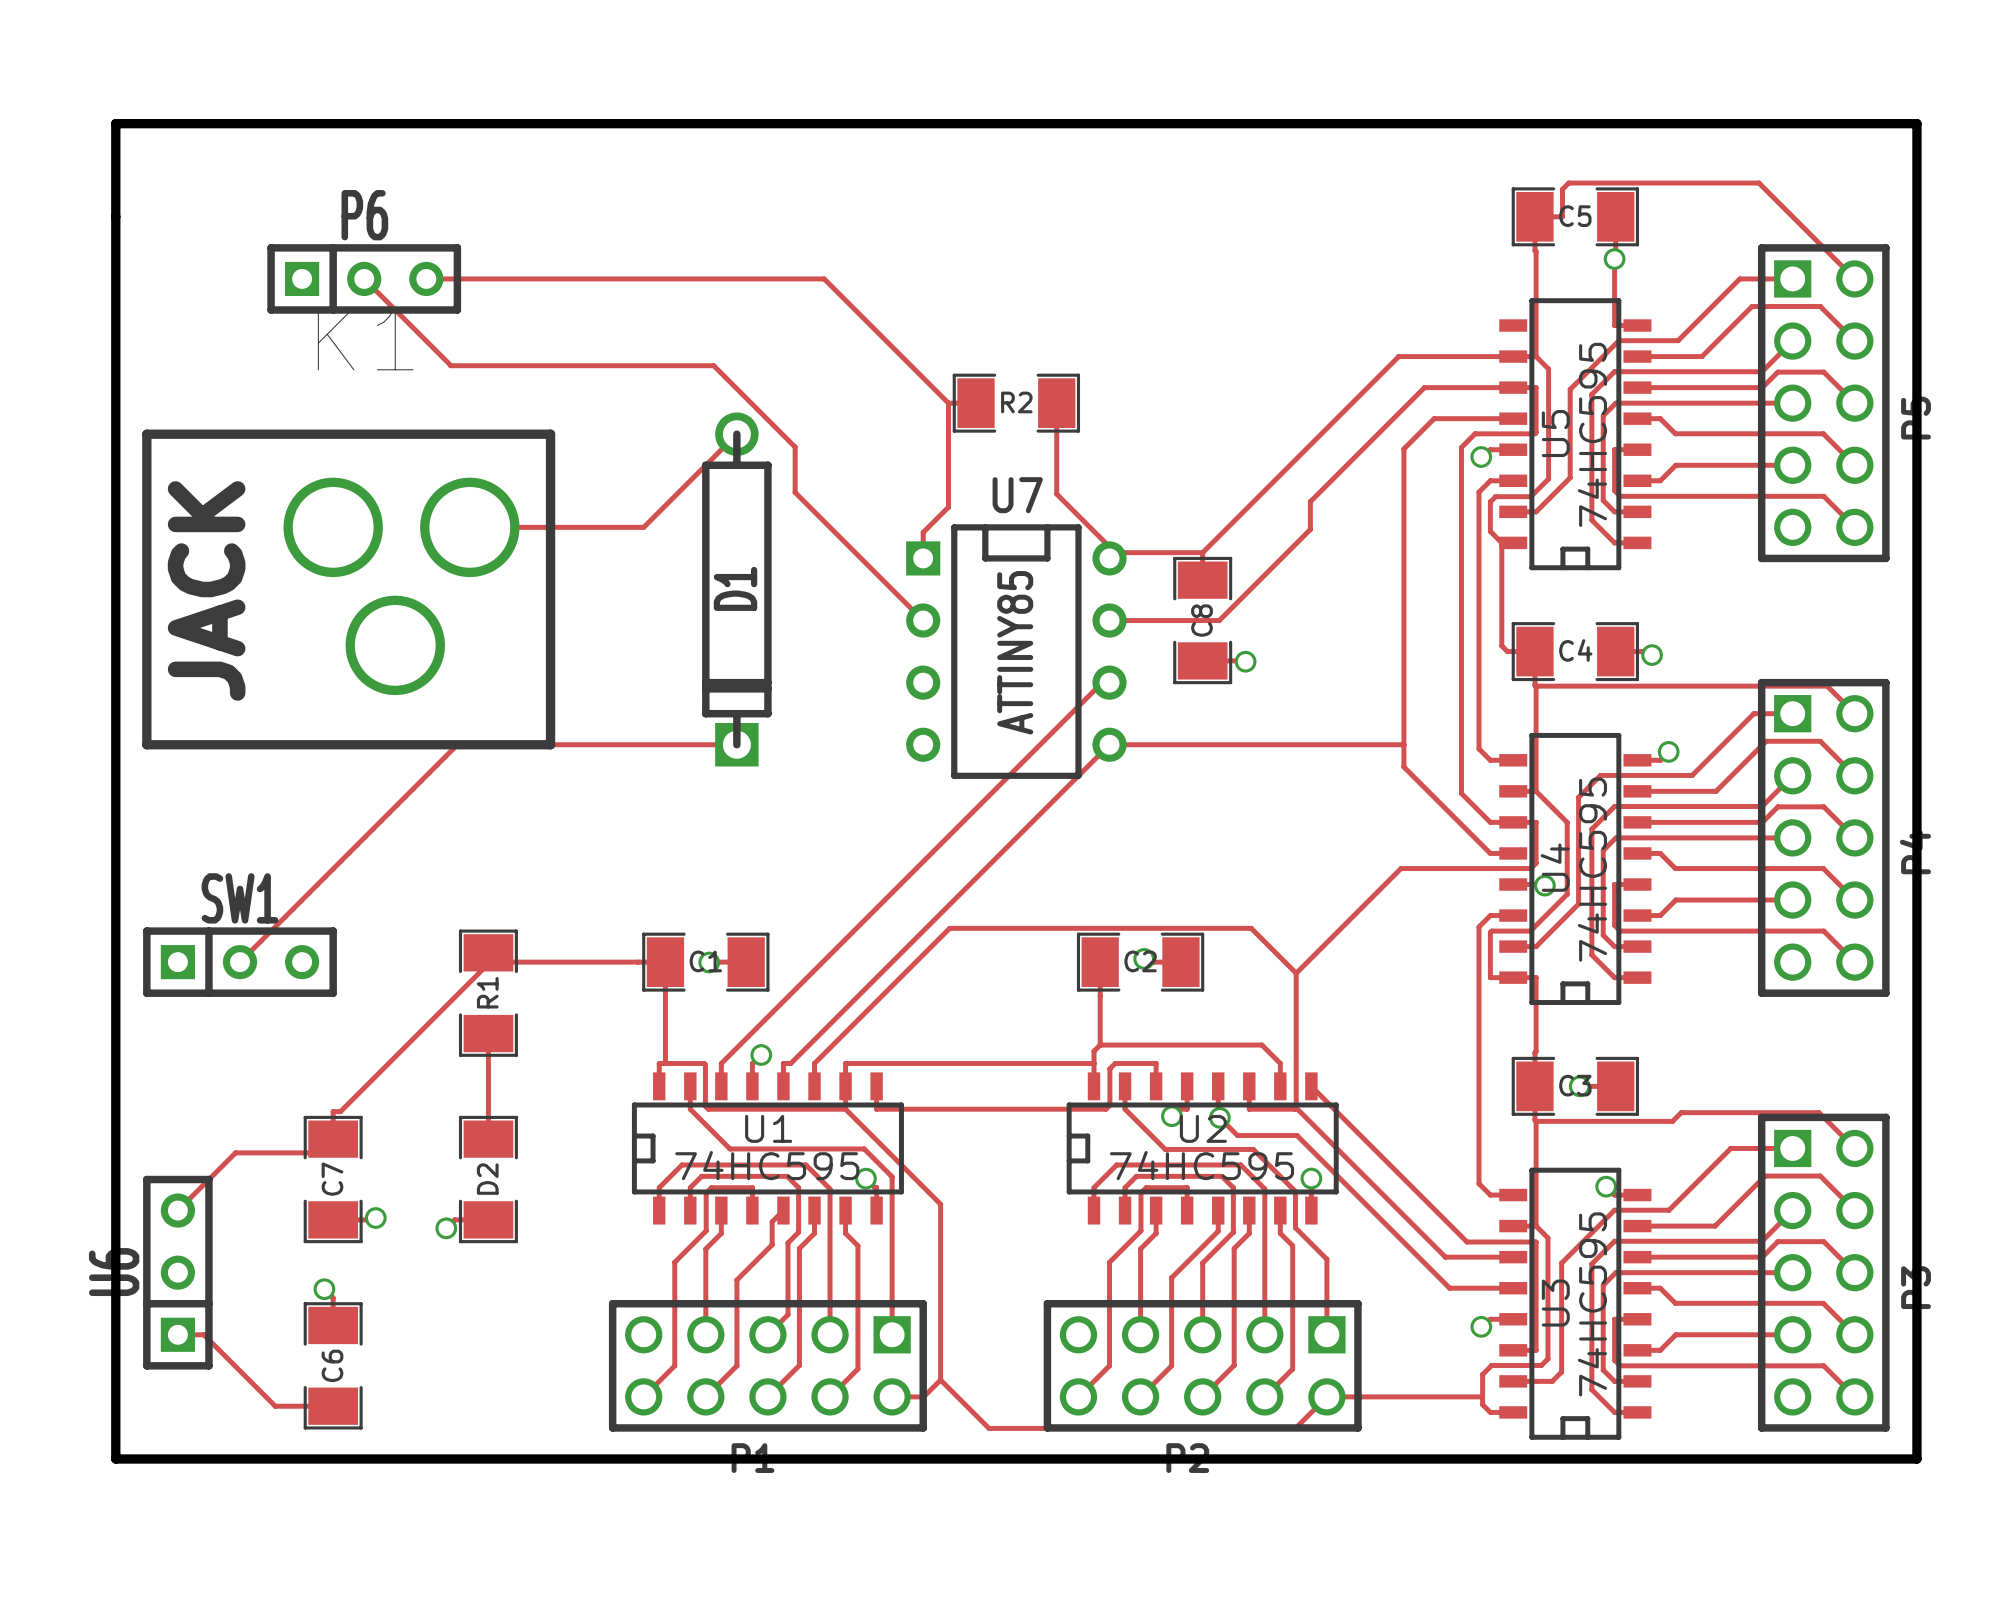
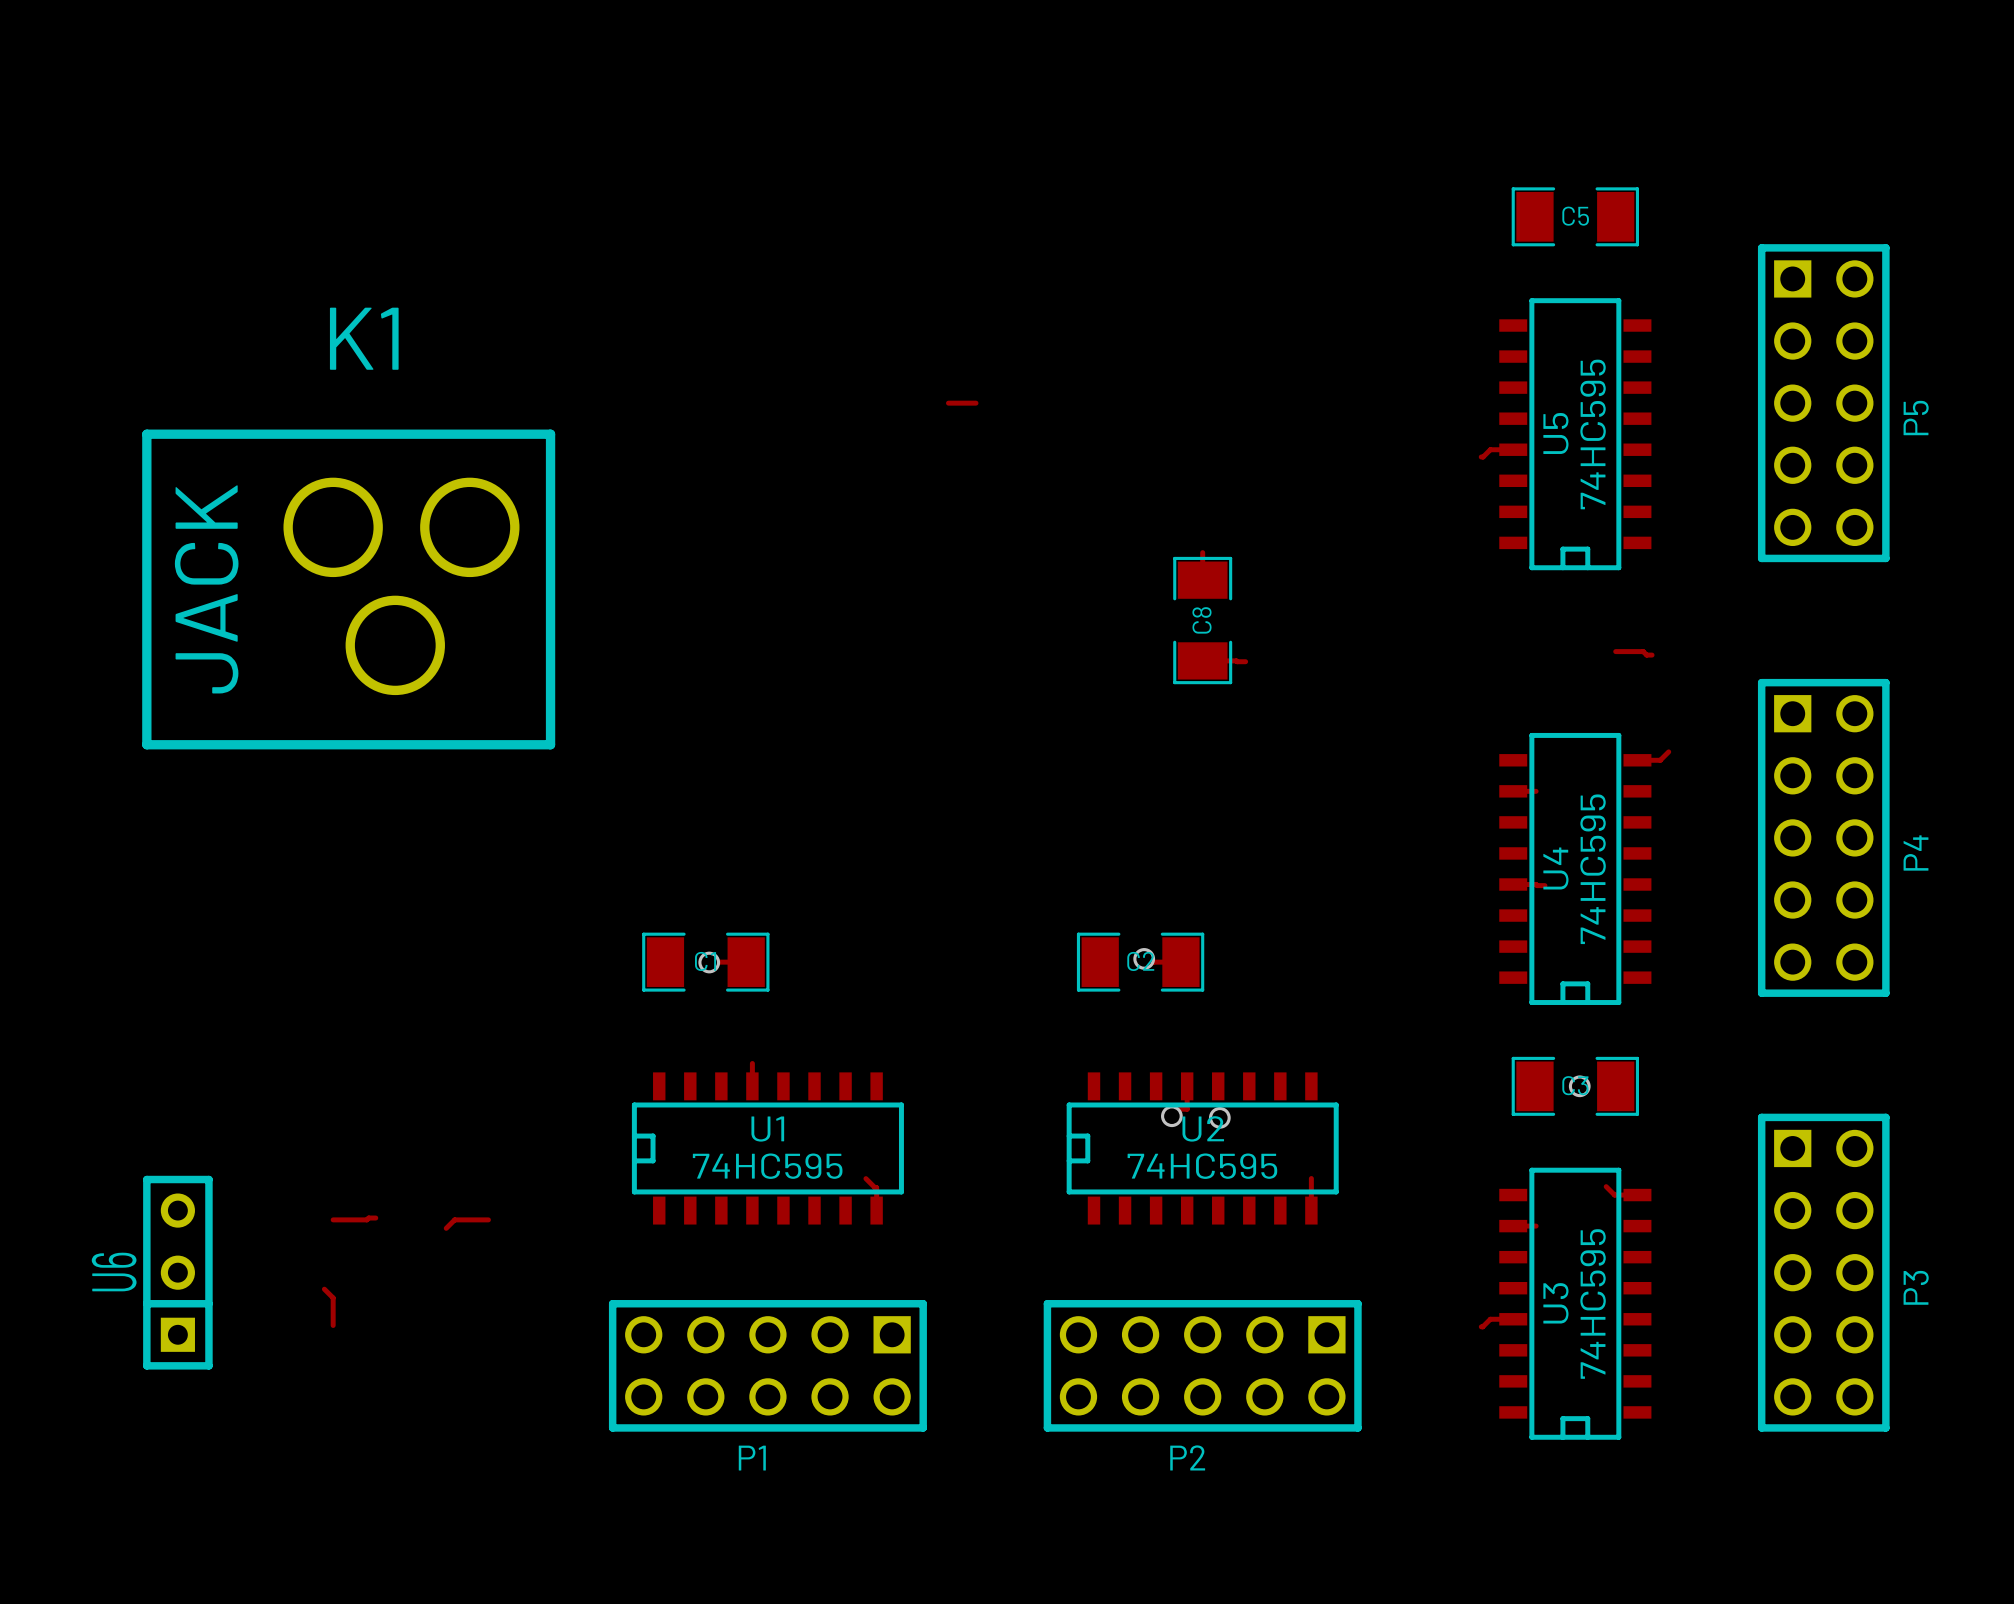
board edge: (115, 123) (115, 1459) (1916, 1459) (1916, 123) (115, 123) -> none
track: (1615, 216) (1614, 325) (1637, 325) -> none
via: (1614, 259) -> none
track: (364, 278) (450, 365) (713, 365) (795, 447) (795, 492) (923, 620) -> none
P6: (364, 278) -> none
track: (426, 278) (824, 278) (948, 403) (948, 507) (923, 532) (923, 558) -> none
track: (1792, 278) (1739, 278) (1678, 340) (1618, 340) (1570, 389) (1570, 477) (1536, 511) (1513, 511) -> none
track: (1854, 278) (1758, 183) (1568, 183) (1562, 189) (1562, 216) (1534, 216) (1536, 356) -> none
track: (1792, 341) (1762, 371) (1614, 371) (1591, 394) (1591, 520) (1614, 542) (1637, 542) -> none
track: (1854, 341) (1820, 306) (1752, 306) (1701, 356) (1637, 356) -> none
track: (1536, 356) (1398, 356) (1202, 552) (1115, 552) -> none
track: (1536, 356) (1548, 369) (1548, 478) (1530, 496) (1495, 496) (1490, 501) (1490, 531) (1501, 542) -> none
track: (1637, 387) (1762, 387) (1777, 372) (1823, 372) (1854, 403) -> none
R2: (1016, 403) -> none
track: (1056, 403) (1056, 494) (1115, 552) -> none
track: (1792, 403) (1615, 403) (1603, 415) (1603, 500) (1614, 511) (1637, 511) -> none
track: (1513, 418) (1434, 418) (1403, 448) (1403, 766) (1490, 853) (1513, 853) -> none
track: (1637, 418) (1660, 418) (1675, 433) (1823, 433) (1854, 465) -> none
track: (736, 434) (643, 527) (469, 527) -> none
track: (1637, 449) (1614, 449) (1614, 490) (1620, 496) (1823, 496) (1854, 527) -> none
via: (1481, 457) -> none
track: (1792, 465) (1675, 465) (1660, 480) (1637, 480) -> none
track: (1513, 480) (1490, 480) (1479, 492) (1479, 748) (1490, 760) (1513, 760) -> none
track: (1501, 542) (1501, 645) (1507, 651) (1534, 651) (1536, 791) (1567, 822) (1567, 894) (1530, 931) (1490, 932) (1490, 977) (1536, 977) (1534, 1120) (1672, 1121) (1681, 1112) (1819, 1112) (1854, 1148) -> none
D1: (736, 589) -> none
track: (1109, 620) (1219, 620) (1310, 529) (1310, 501) (1424, 387) (1536, 387) (1534, 433) (1475, 433) (1461, 447) (1461, 793) (1490, 822) (1536, 822) (1536, 863) (1530, 868) (1401, 868) (1296, 973) -> none
U7: ATTINY85 (1016, 651) -> none
C4: (1575, 651) -> none
via: (1652, 655) -> none
via: (1245, 661) -> none
track: (1109, 682) (1102, 682) (721, 1063) (721, 1086) -> none
track: (1536, 686) (1827, 686) (1854, 713) -> none
track: (1792, 713) (1753, 713) (1692, 775) (1600, 775) (1578, 797) (1578, 904) (1536, 946) (1513, 946) -> none
track: (736, 744) (457, 744) (240, 962) -> none
track: (1403, 744) (1109, 744) (790, 1063) (783, 1063) (783, 1086) -> none
via: (1668, 751) -> none
track: (1792, 775) (1762, 806) (1614, 806) (1591, 829) (1591, 954) (1614, 977) (1637, 977) -> none
track: (1854, 775) (1820, 741) (1766, 741) (1716, 791) (1637, 791) -> none
track: (1637, 822) (1762, 822) (1777, 806) (1823, 806) (1854, 837) -> none
track: (1792, 837) (1615, 837) (1603, 850) (1603, 935) (1614, 946) (1637, 946) -> none
track: (1637, 853) (1660, 853) (1675, 868) (1823, 868) (1854, 900) -> none
track: (1637, 884) (1614, 884) (1614, 925) (1620, 931) (1823, 931) (1854, 962) -> none
via: (1544, 885) -> none
track: (1792, 900) (1675, 900) (1660, 915) (1637, 915) -> none
track: (1513, 915) (1490, 915) (1479, 926) (1479, 1183) (1490, 1195) (1513, 1195) -> none
SW1: (240, 962) -> none
track: (489, 962) (665, 962) (665, 1063) -> none
track: (489, 962) (340, 1111) (333, 1111) (333, 1152) (235, 1152) (177, 1210) -> none
track: (1100, 962) (1100, 1045) -> none
track: (1296, 973) (1296, 1107) -> none
track: (1296, 973) (1251, 928) (949, 928) (814, 1063) (814, 1086) -> none
R1: (488, 993) -> none
track: (488, 1033) (488, 1139) -> none
track: (1100, 1045) (1261, 1045) (1280, 1063) (1280, 1086) -> none
track: (1100, 1045) (1094, 1051) (1094, 1086) -> none
via: (761, 1054) -> none
track: (1094, 1063) (845, 1063) (845, 1109) -> none
track: (659, 1086) (659, 1063) (704, 1063) (705, 1106) (708, 1109) (845, 1109) -> none
track: (690, 1086) (690, 1109) (730, 1148) (864, 1148) (892, 1176) (892, 1334) -> none
track: (876, 1086) (876, 1109) (1105, 1109) (1109, 1105) (1109, 1068) (1115, 1063) (1156, 1063) (1156, 1086) -> none
track: (1125, 1086) (1125, 1109) (1165, 1149) (1253, 1149) (1295, 1191) (1295, 1227) (1326, 1259) (1326, 1334) -> none
track: (1218, 1086) (1219, 1117) (1237, 1135) (1297, 1135) (1449, 1288) (1513, 1288) -> none
track: (1249, 1086) (1249, 1109) (1296, 1107) -> none
track: (1311, 1086) (1467, 1242) (1535, 1242) -> none
track: (1296, 1107) (1445, 1257) (1513, 1257) -> none
track: (845, 1109) (940, 1204) (940, 1380) -> none
track: (1536, 1121) (1536, 1226) (1547, 1237) (1547, 1358) (1541, 1365) (1491, 1365) (1482, 1374) (1482, 1404) (1490, 1412) (1513, 1412) -> none
track: (1792, 1148) (1730, 1148) (1669, 1210) (1614, 1210) (1561, 1263) (1561, 1371) (1552, 1381) (1513, 1381) -> none
via: (865, 1178) -> none
via: (1311, 1178) -> none
C7: (333, 1179) -> none
D2: (488, 1179) -> none
via: (1606, 1186) -> none
track: (659, 1210) (659, 1187) (681, 1164) (806, 1164) (830, 1189) (830, 1334) -> none
track: (690, 1210) (690, 1187) (701, 1176) (787, 1176) (798, 1187) (798, 1232) (787, 1242) (787, 1314) (767, 1334) -> none
track: (721, 1210) (721, 1233) (705, 1248) (705, 1334) -> none
track: (752, 1210) (752, 1187) (711, 1187) (706, 1192) (706, 1230) (674, 1262) (674, 1365) (643, 1396) -> none
track: (783, 1210) (772, 1221) (772, 1244) (736, 1280) (736, 1365) (705, 1396) -> none
track: (814, 1210) (814, 1233) (799, 1248) (799, 1365) (767, 1396) -> none
track: (845, 1210) (845, 1233) (857, 1245) (857, 1369) (830, 1396) -> none
track: (1094, 1210) (1094, 1187) (1116, 1164) (1240, 1164) (1264, 1189) (1264, 1334) -> none
track: (1125, 1210) (1125, 1187) (1136, 1176) (1221, 1176) (1233, 1187) (1233, 1232) (1202, 1262) (1202, 1334) -> none
track: (1156, 1210) (1156, 1233) (1140, 1248) (1140, 1334) -> none
track: (1187, 1210) (1187, 1187) (1146, 1187) (1140, 1192) (1140, 1230) (1109, 1262) (1109, 1365) (1078, 1396) -> none
track: (1218, 1210) (1218, 1231) (1171, 1277) (1171, 1365) (1140, 1396) -> none
track: (1249, 1210) (1249, 1233) (1234, 1248) (1234, 1365) (1202, 1396) -> none
track: (1280, 1210) (1280, 1233) (1292, 1245) (1292, 1369) (1264, 1396) -> none
track: (1792, 1210) (1762, 1241) (1614, 1241) (1591, 1263) (1591, 1389) (1614, 1412) (1637, 1412) -> none
track: (1854, 1210) (1820, 1176) (1765, 1176) (1715, 1226) (1637, 1226) -> none
via: (375, 1218) -> none
via: (446, 1228) -> none
track: (1536, 1242) (1536, 1350) (1513, 1350) -> none
track: (1637, 1257) (1762, 1257) (1777, 1241) (1823, 1241) (1854, 1272) -> none
track: (1792, 1272) (1615, 1272) (1603, 1285) (1603, 1370) (1614, 1381) (1637, 1381) -> none
track: (1637, 1288) (1660, 1288) (1675, 1303) (1823, 1303) (1854, 1334) -> none
via: (324, 1289) -> none
track: (1637, 1319) (1614, 1319) (1614, 1360) (1620, 1365) (1823, 1365) (1854, 1396) -> none
via: (1481, 1326) -> none
track: (177, 1334) (203, 1334) (275, 1406) (333, 1406) -> none
track: (1792, 1334) (1675, 1334) (1660, 1350) (1637, 1350) -> none
C6: (333, 1365) -> none
track: (940, 1380) (989, 1428) (1295, 1428) (1326, 1396) (1482, 1396) -> none
track: (940, 1380) (923, 1396) (892, 1396) -> none

